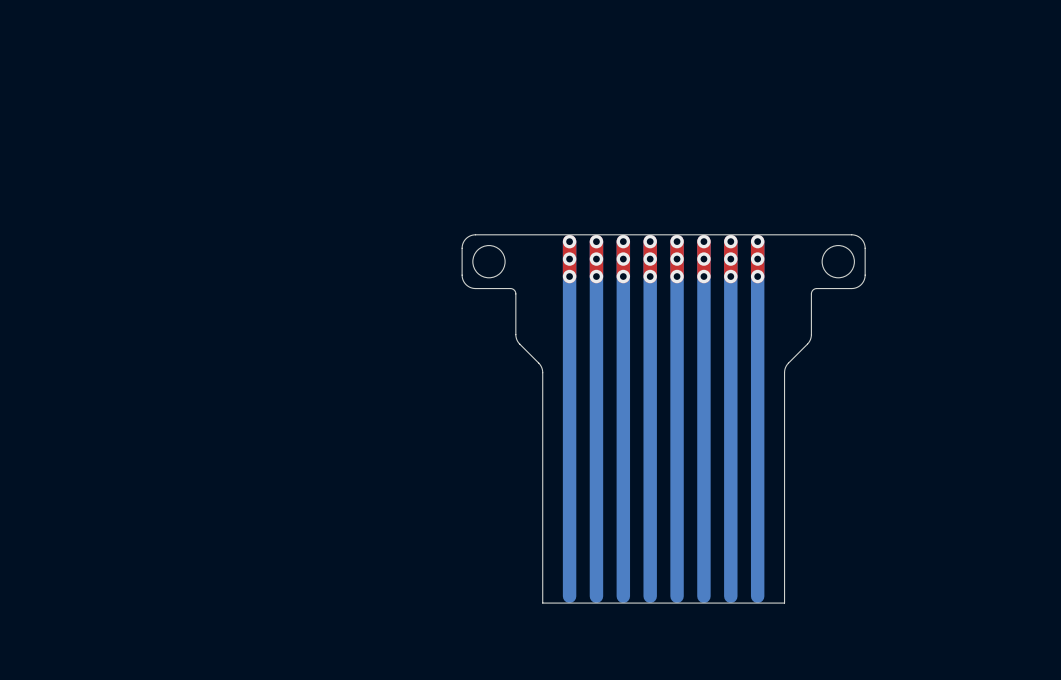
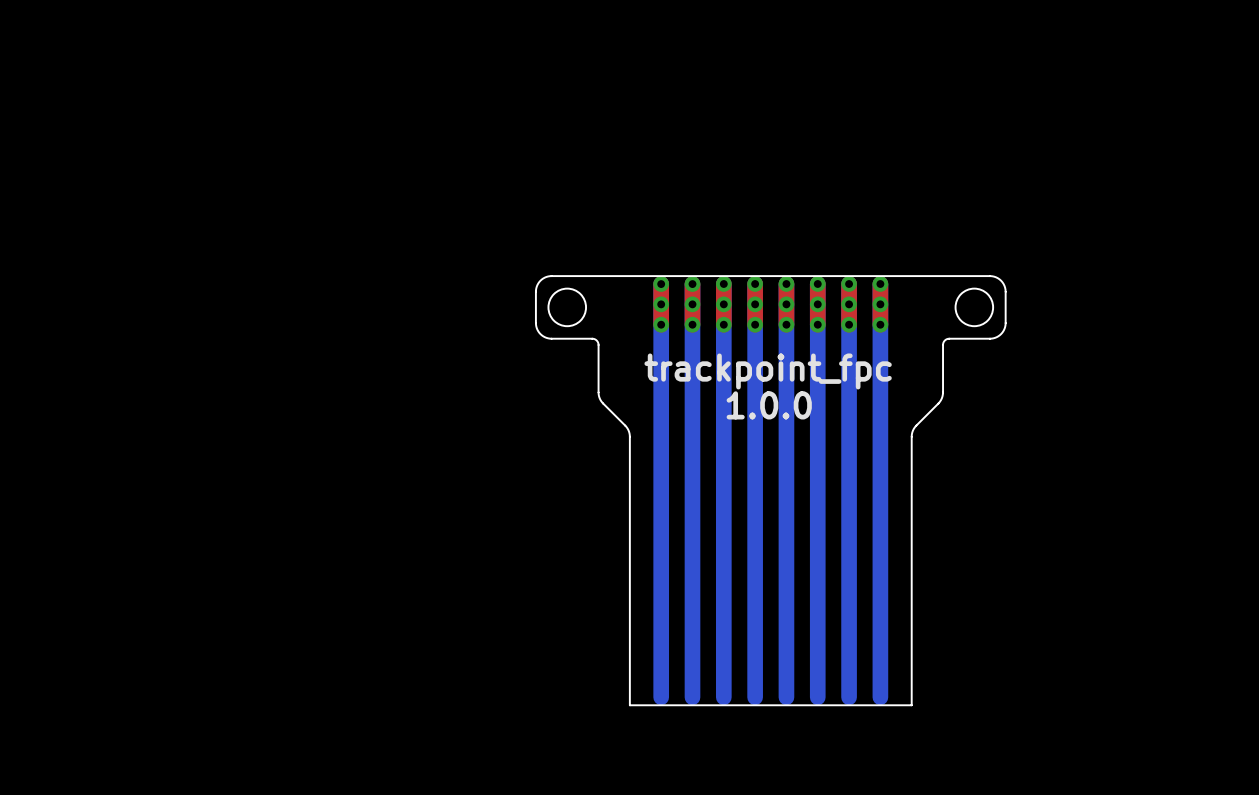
text: none -> trackpoint_fpc (768, 371)
text: none -> 1.0.0 (769, 405)

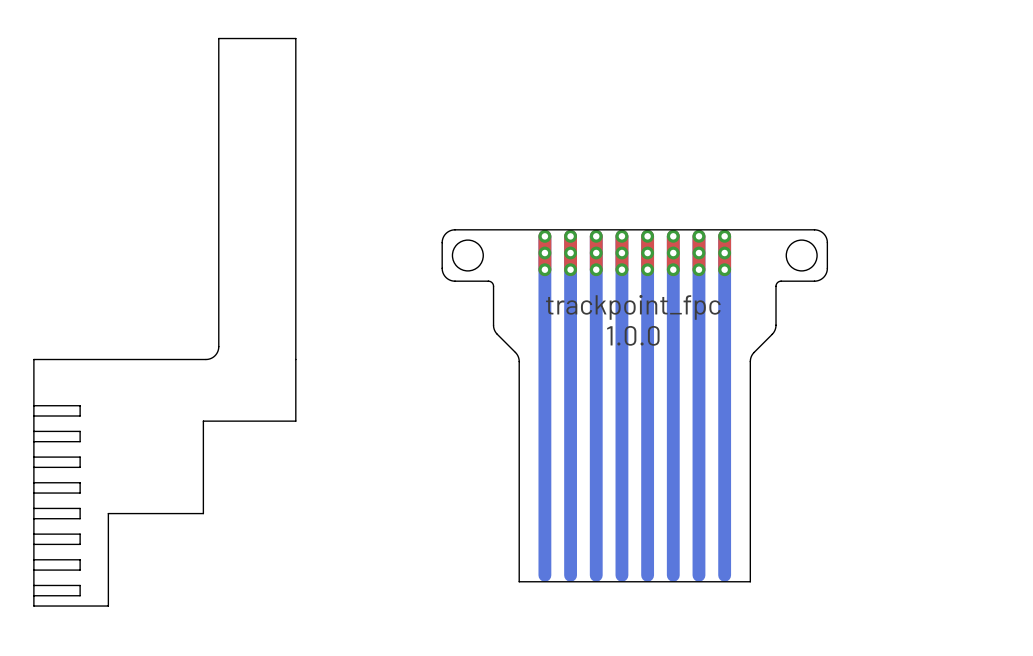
board edge: none -> (218, 38) (218, 350) (212, 357) (205, 359) (33, 359) (33, 606) (108, 606) (108, 513) (203, 513) (203, 421) (295, 421) (295, 38) (218, 38)
board edge: none -> (33, 405) (80, 405) (80, 416) (33, 416)
board edge: none -> (33, 431) (80, 431) (80, 441) (33, 441)
board edge: none -> (33, 457) (80, 457) (80, 467) (33, 467)
board edge: none -> (33, 482) (80, 482) (80, 493) (33, 493)
board edge: none -> (33, 508) (80, 508) (80, 518) (33, 518)
board edge: none -> (33, 534) (80, 534) (80, 544) (33, 544)
board edge: none -> (33, 559) (80, 559) (80, 570) (33, 570)
board edge: none -> (33, 585) (80, 585) (80, 595) (33, 595)

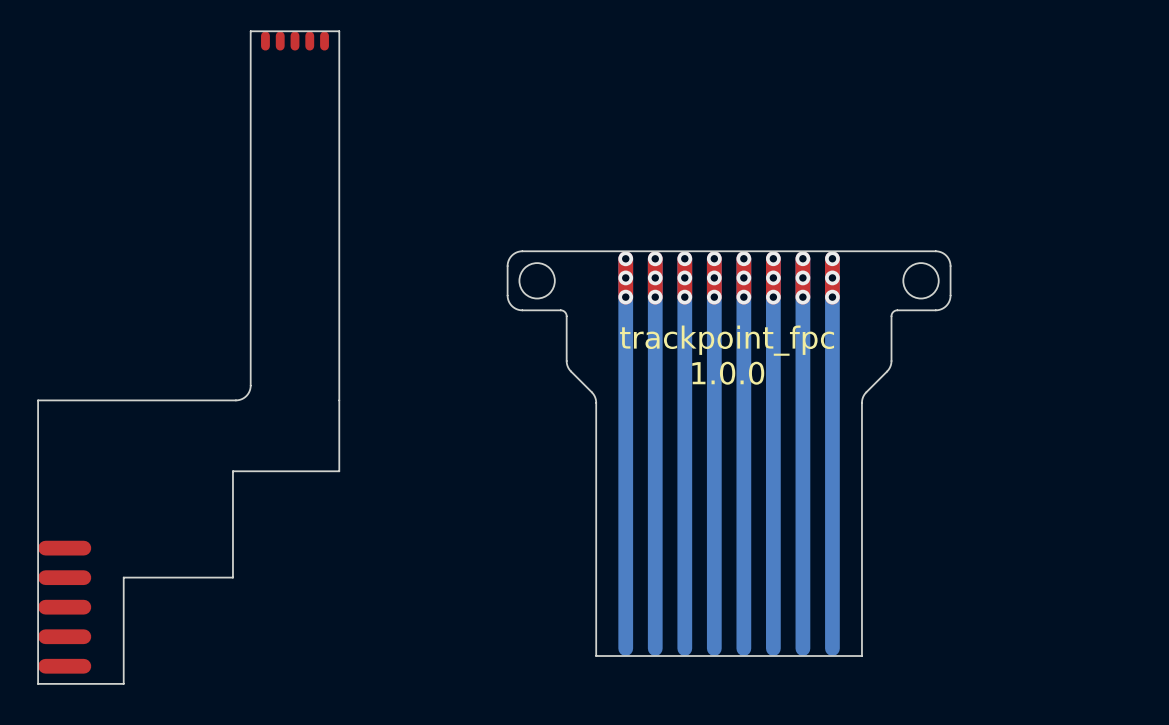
top track: none -> (265, 35) (265, 46)
top track: none -> (280, 35) (280, 46)
top track: none -> (294, 35) (294, 46)
top track: none -> (309, 35) (309, 46)
top track: none -> (324, 35) (324, 46)
board edge: (33, 405) (80, 405) (80, 416) (33, 416) -> none
board edge: (33, 431) (80, 431) (80, 441) (33, 441) -> none
board edge: (33, 457) (80, 457) (80, 467) (33, 467) -> none
board edge: (33, 482) (80, 482) (80, 493) (33, 493) -> none
top track: none -> (45, 548) (83, 548)
board edge: (33, 508) (80, 508) (80, 518) (33, 518) -> none
top track: none -> (45, 577) (83, 577)
board edge: (33, 534) (80, 534) (80, 544) (33, 544) -> none
top track: none -> (45, 607) (83, 607)
board edge: (33, 559) (80, 559) (80, 570) (33, 570) -> none
top track: none -> (45, 636) (83, 636)
board edge: (33, 585) (80, 585) (80, 595) (33, 595) -> none
top track: none -> (45, 666) (83, 666)

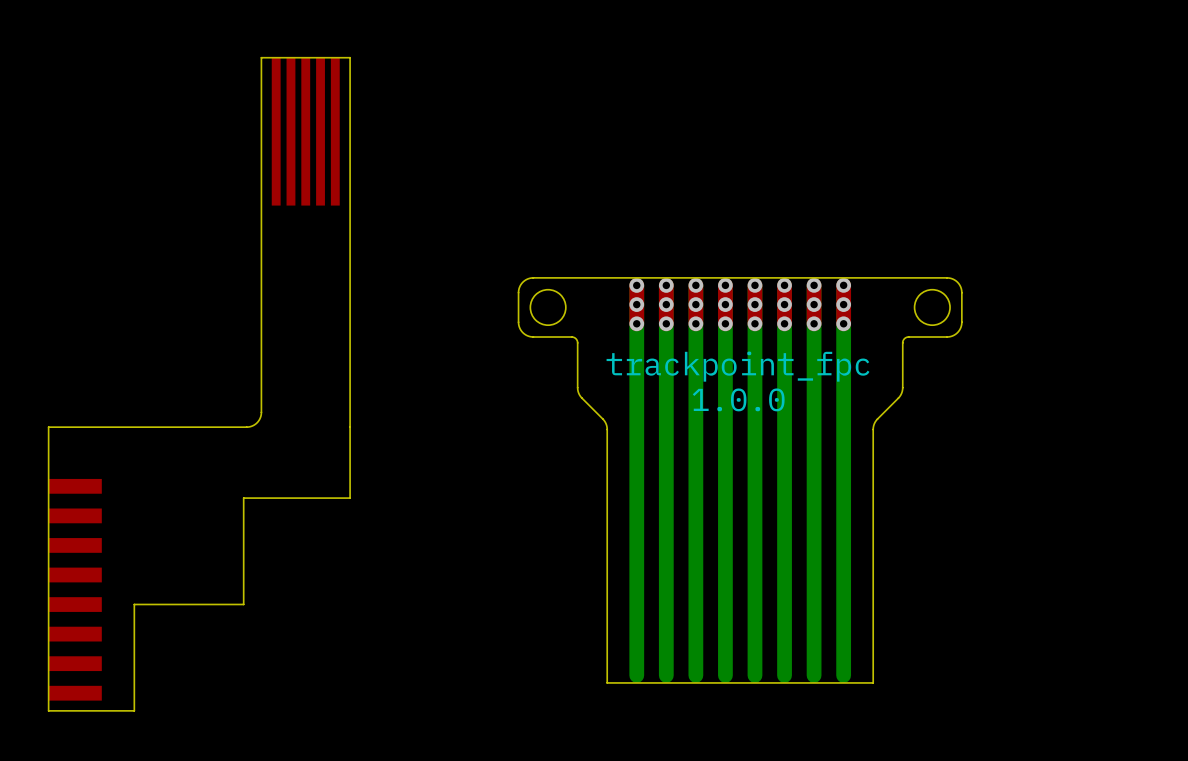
top track: (265, 35) (265, 46) -> none
top track: (280, 35) (280, 46) -> none
top track: (294, 35) (294, 46) -> none
top track: (309, 35) (309, 46) -> none
top track: (324, 35) (324, 46) -> none
part: none -> (305, 131)
top track: (45, 548) (83, 548) -> none
part: none -> (75, 589)
top track: (45, 577) (83, 577) -> none
top track: (45, 607) (83, 607) -> none
top track: (45, 636) (83, 636) -> none
top track: (45, 666) (83, 666) -> none

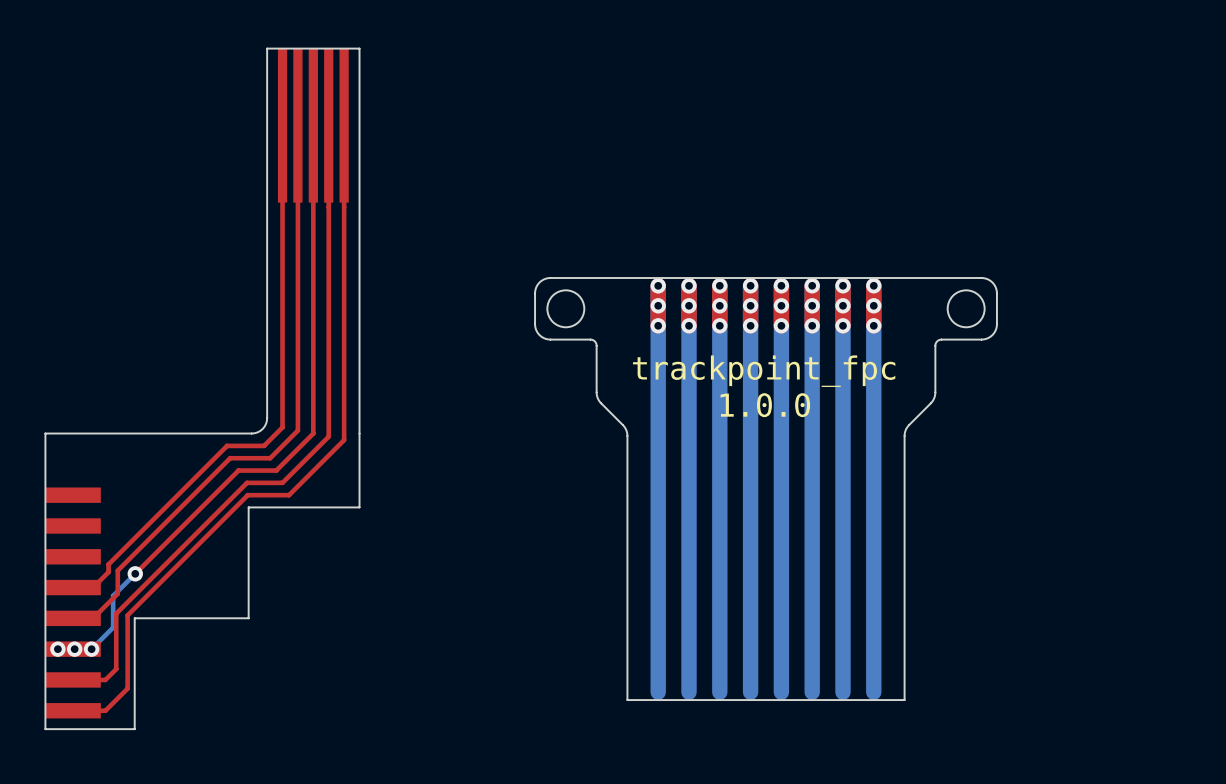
top track: none -> (328, 125) (328, 436) (282, 482) (247, 482) (116, 613) (116, 669) (105, 679) (73, 679) (97, 679)
top track: none -> (344, 125) (344, 440) (289, 495) (247, 495) (127, 615) (127, 688) (105, 710) (73, 710) (97, 710)
top track: none -> (313, 178) (313, 433) (276, 470) (238, 470) (135, 573)
top track: none -> (282, 184) (282, 427) (264, 445) (227, 445) (108, 564) (108, 572) (93, 587) (73, 587)
top track: none -> (297, 190) (297, 430) (270, 458) (230, 458) (117, 570) (117, 593) (93, 618)
bottom track: none -> (135, 573) (113, 595) (113, 627) (91, 649)
via: none -> (135, 573)
via: none -> (57, 649)
via: none -> (74, 649)
via: none -> (91, 649)

